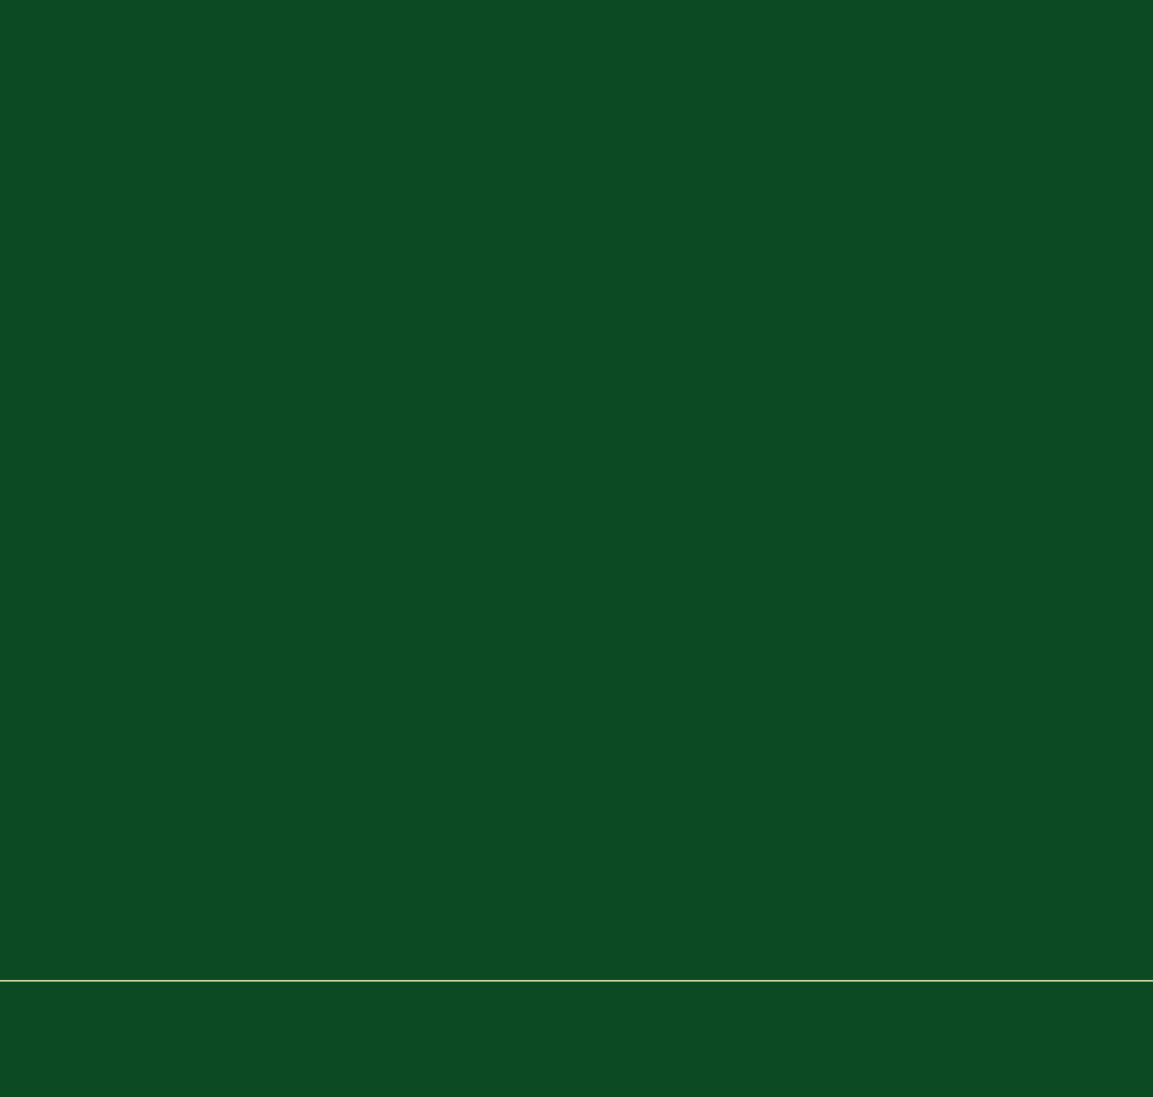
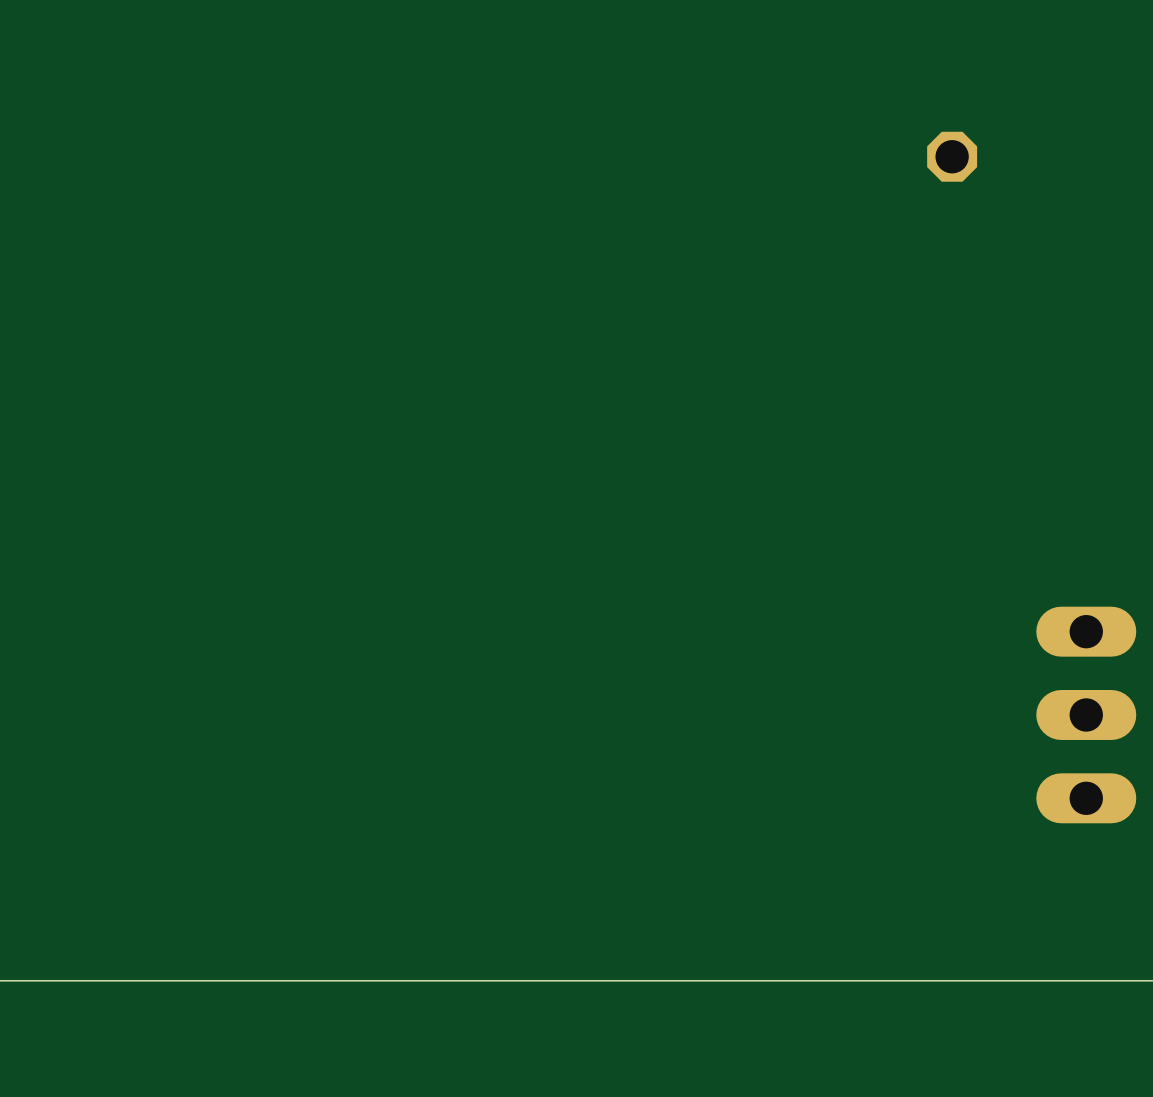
part: none -> (952, 156)
part: none -> (1086, 714)

